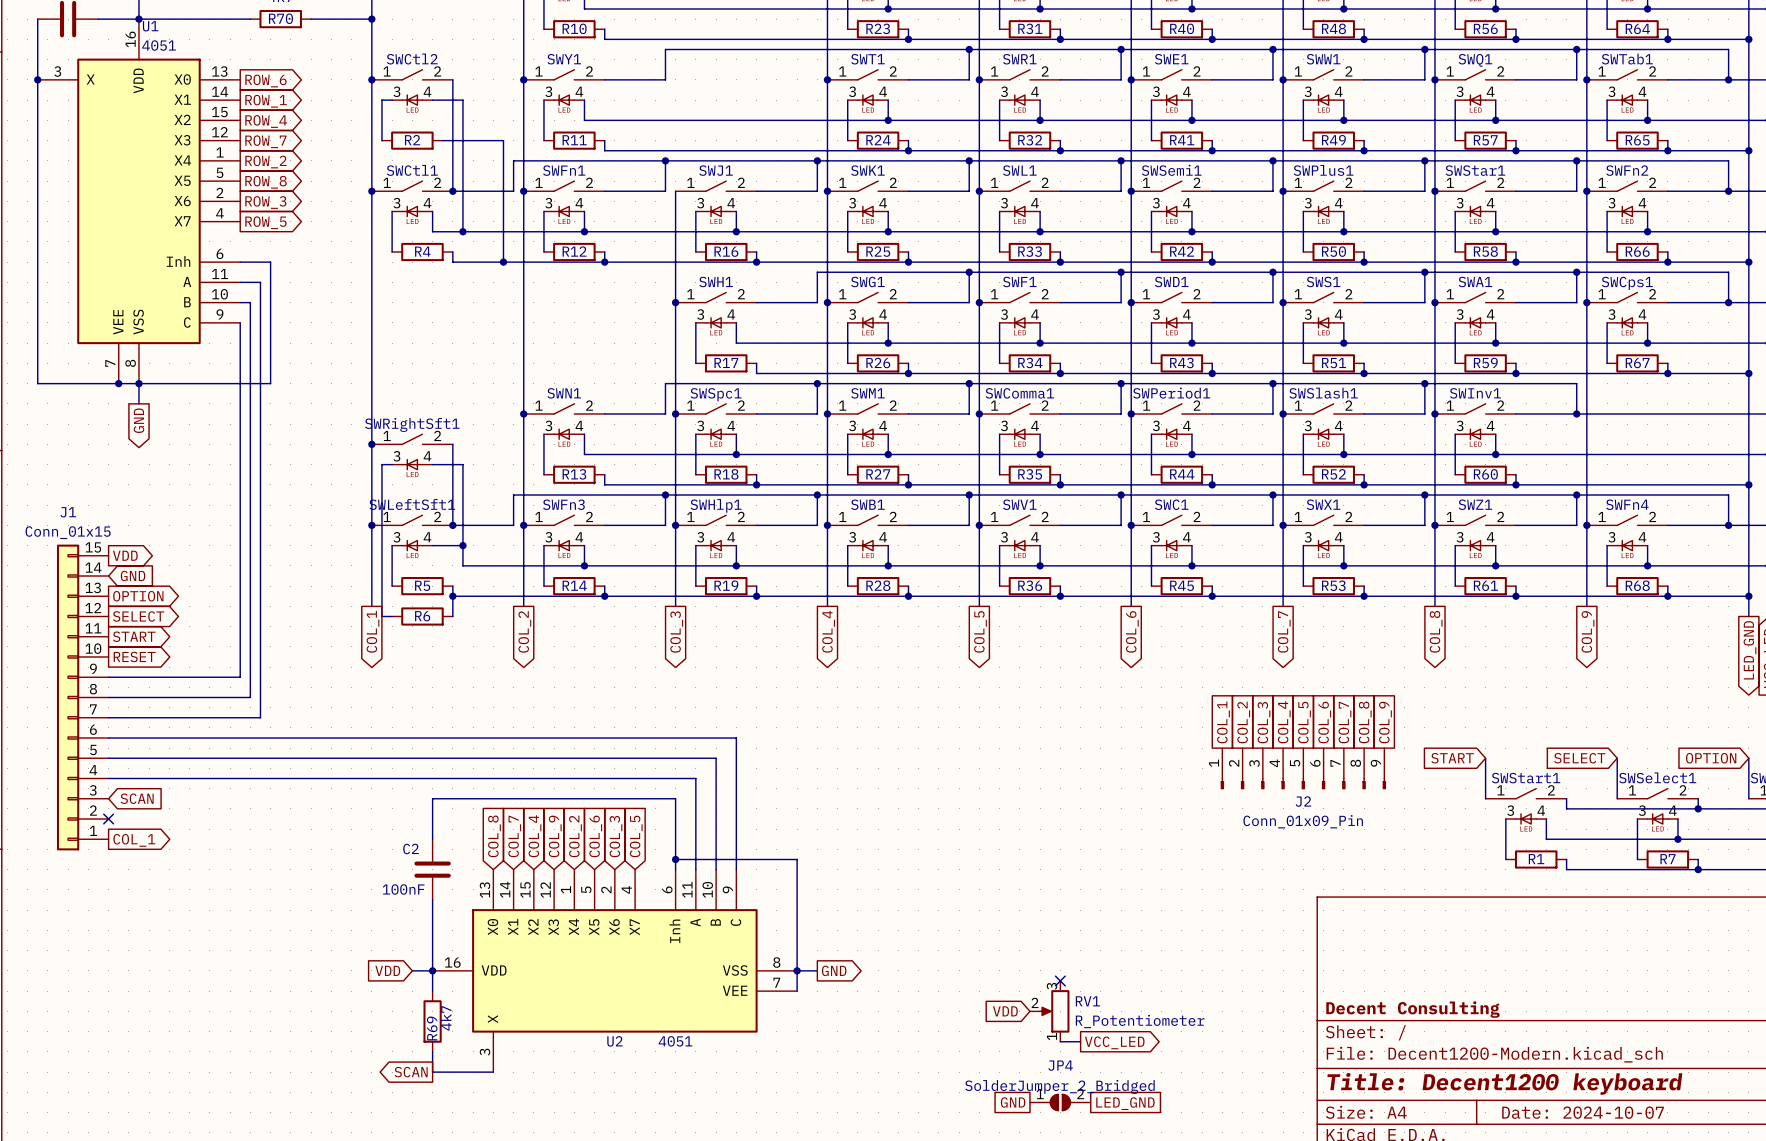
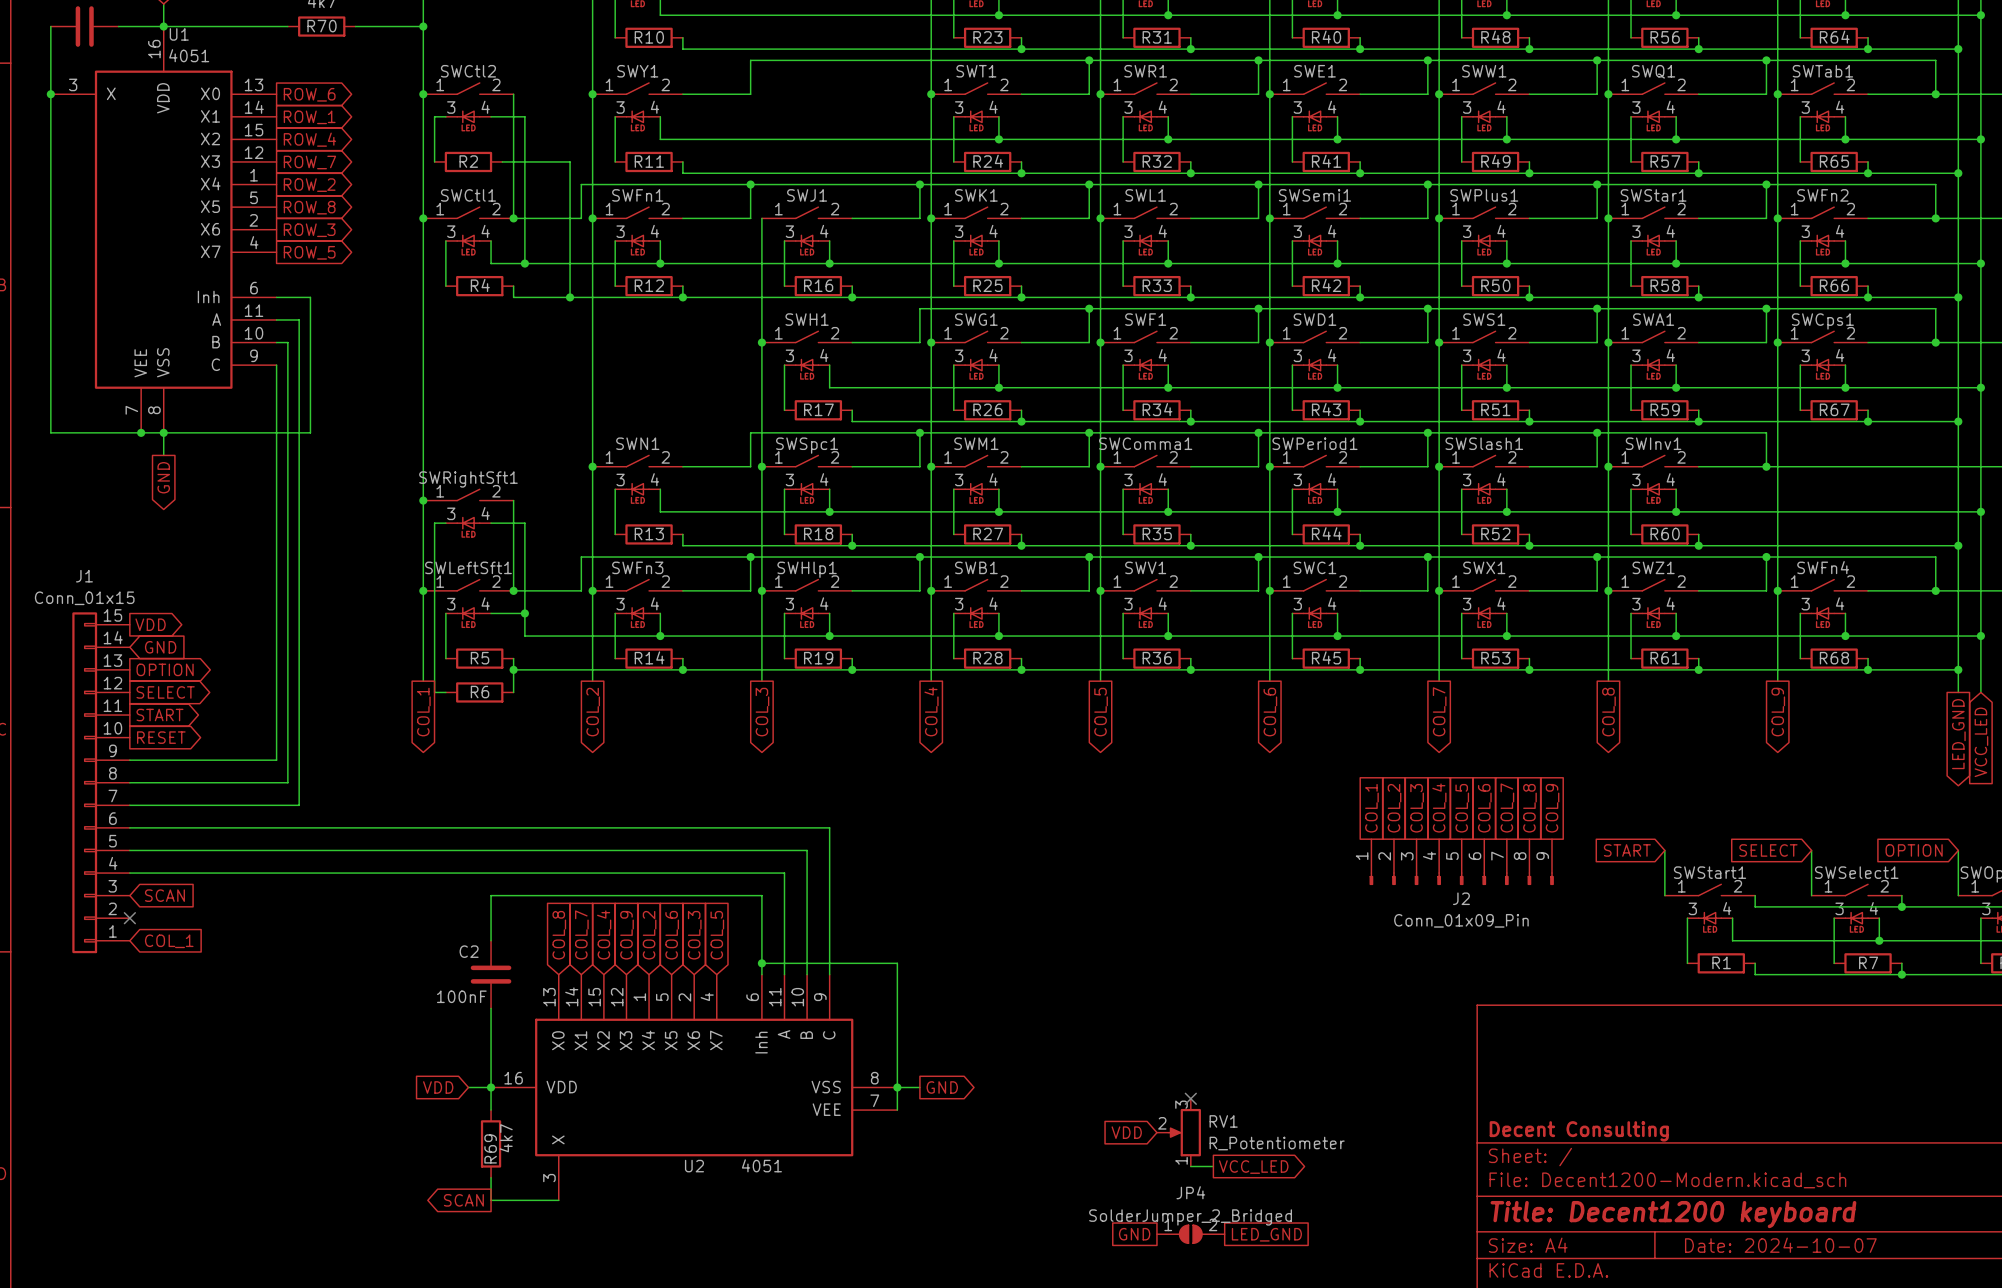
global label shape: output (134, 840) -> input (169, 941)

